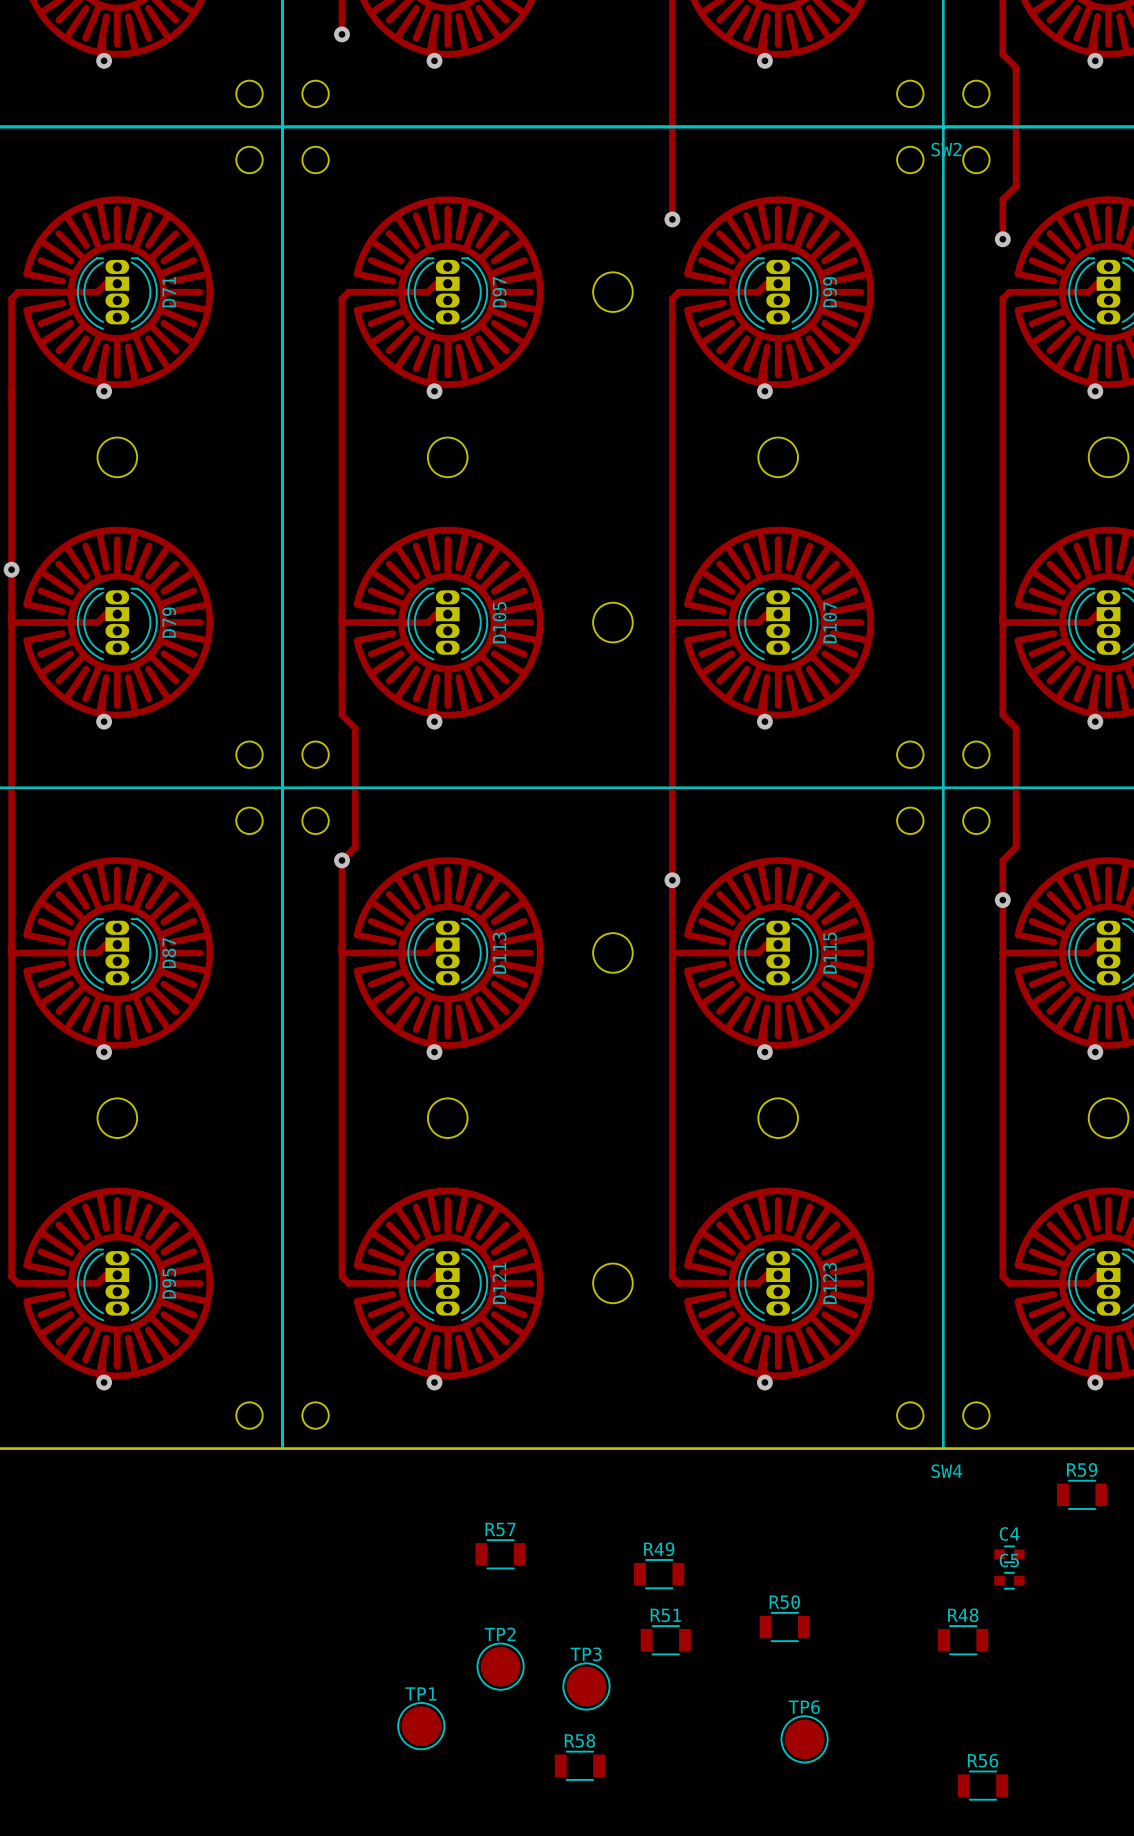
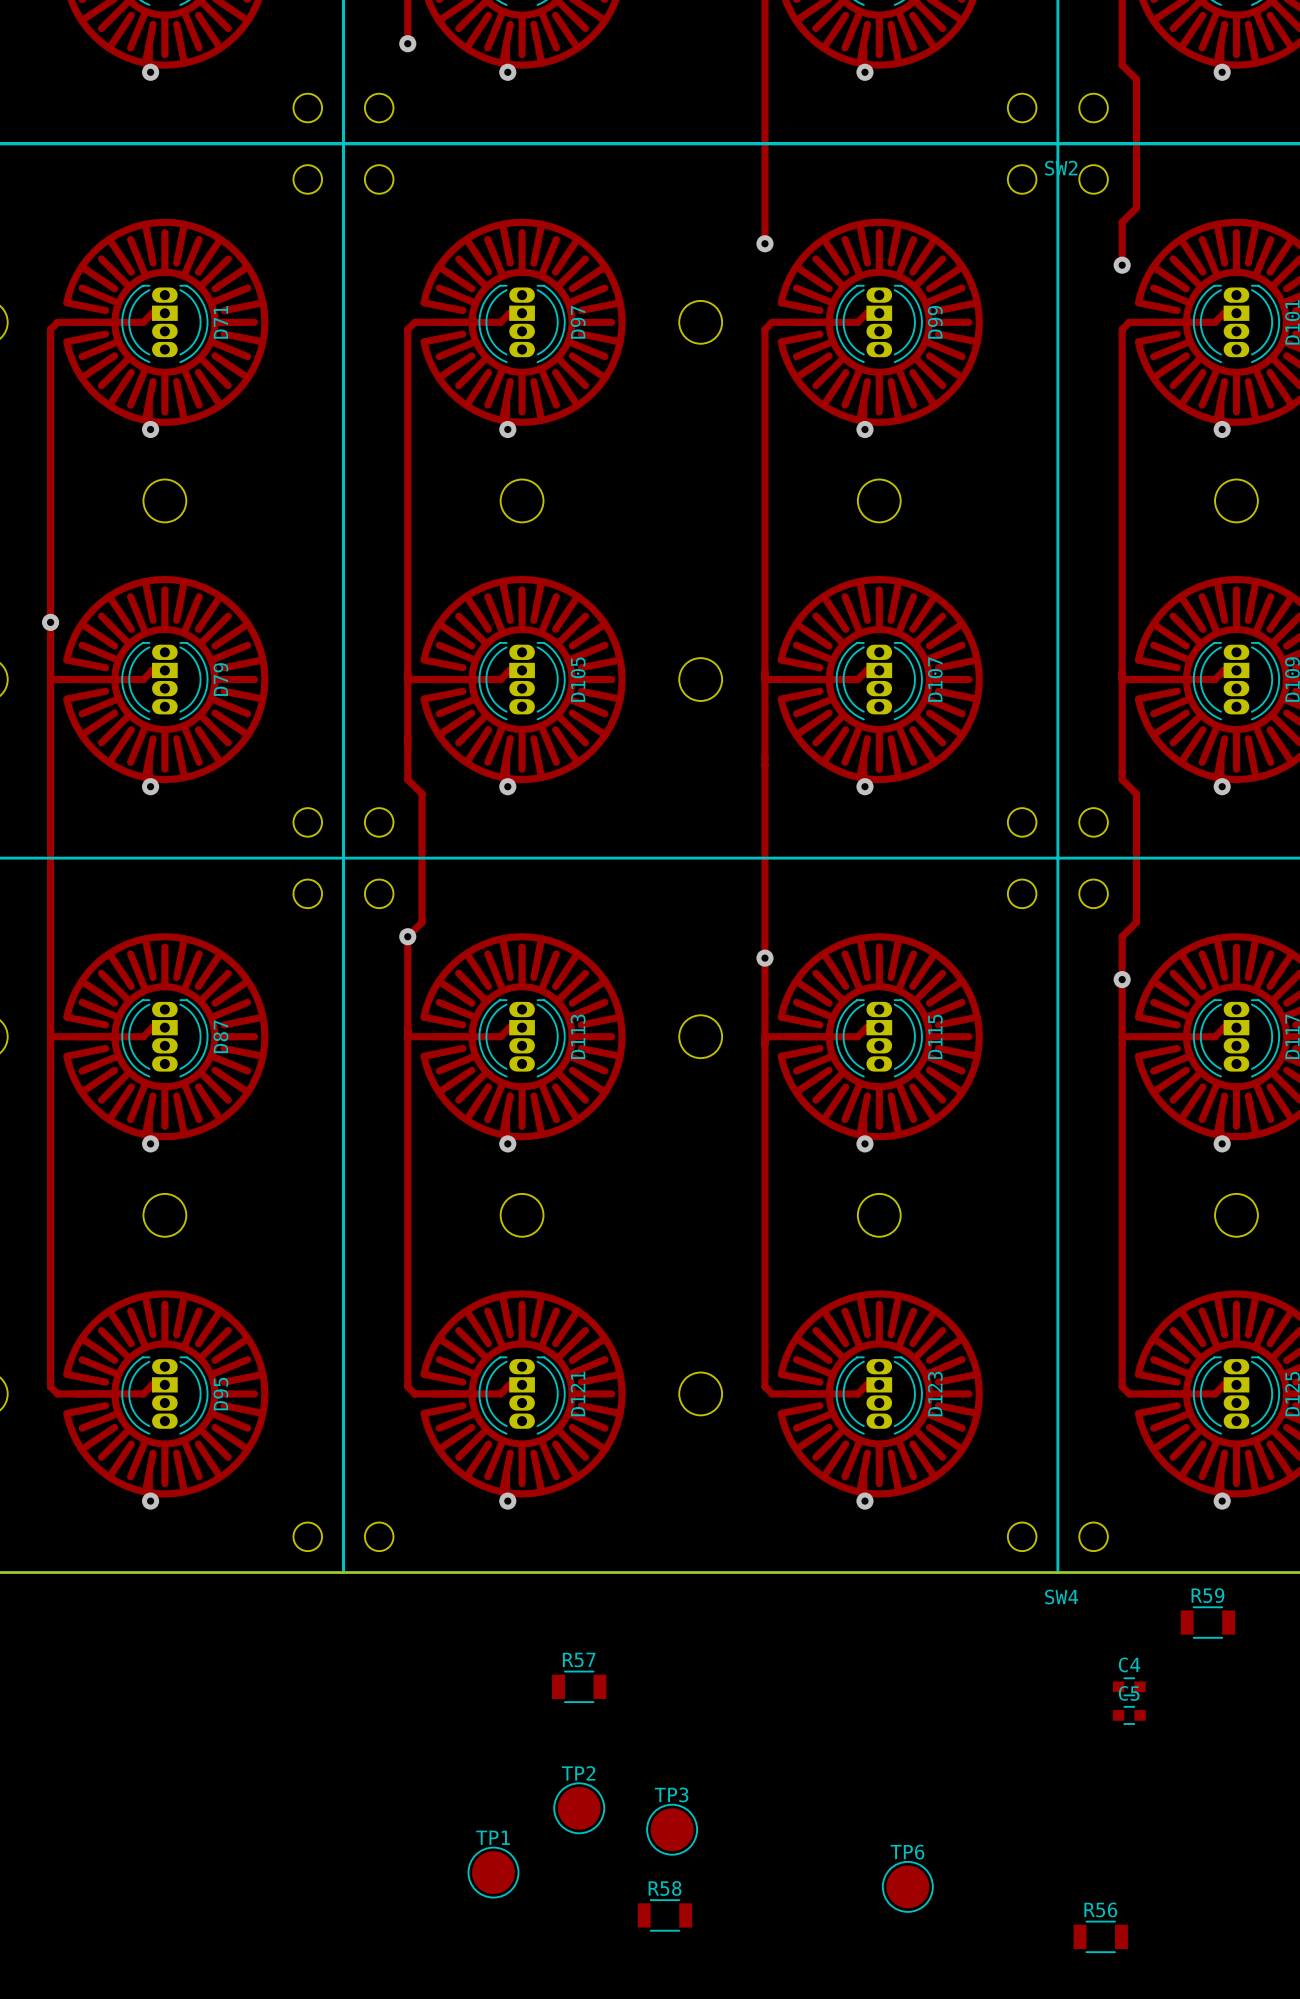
R49: (659, 1574) -> none
R50: (784, 1627) -> none
R51: (665, 1640) -> none
R48: (963, 1640) -> none

